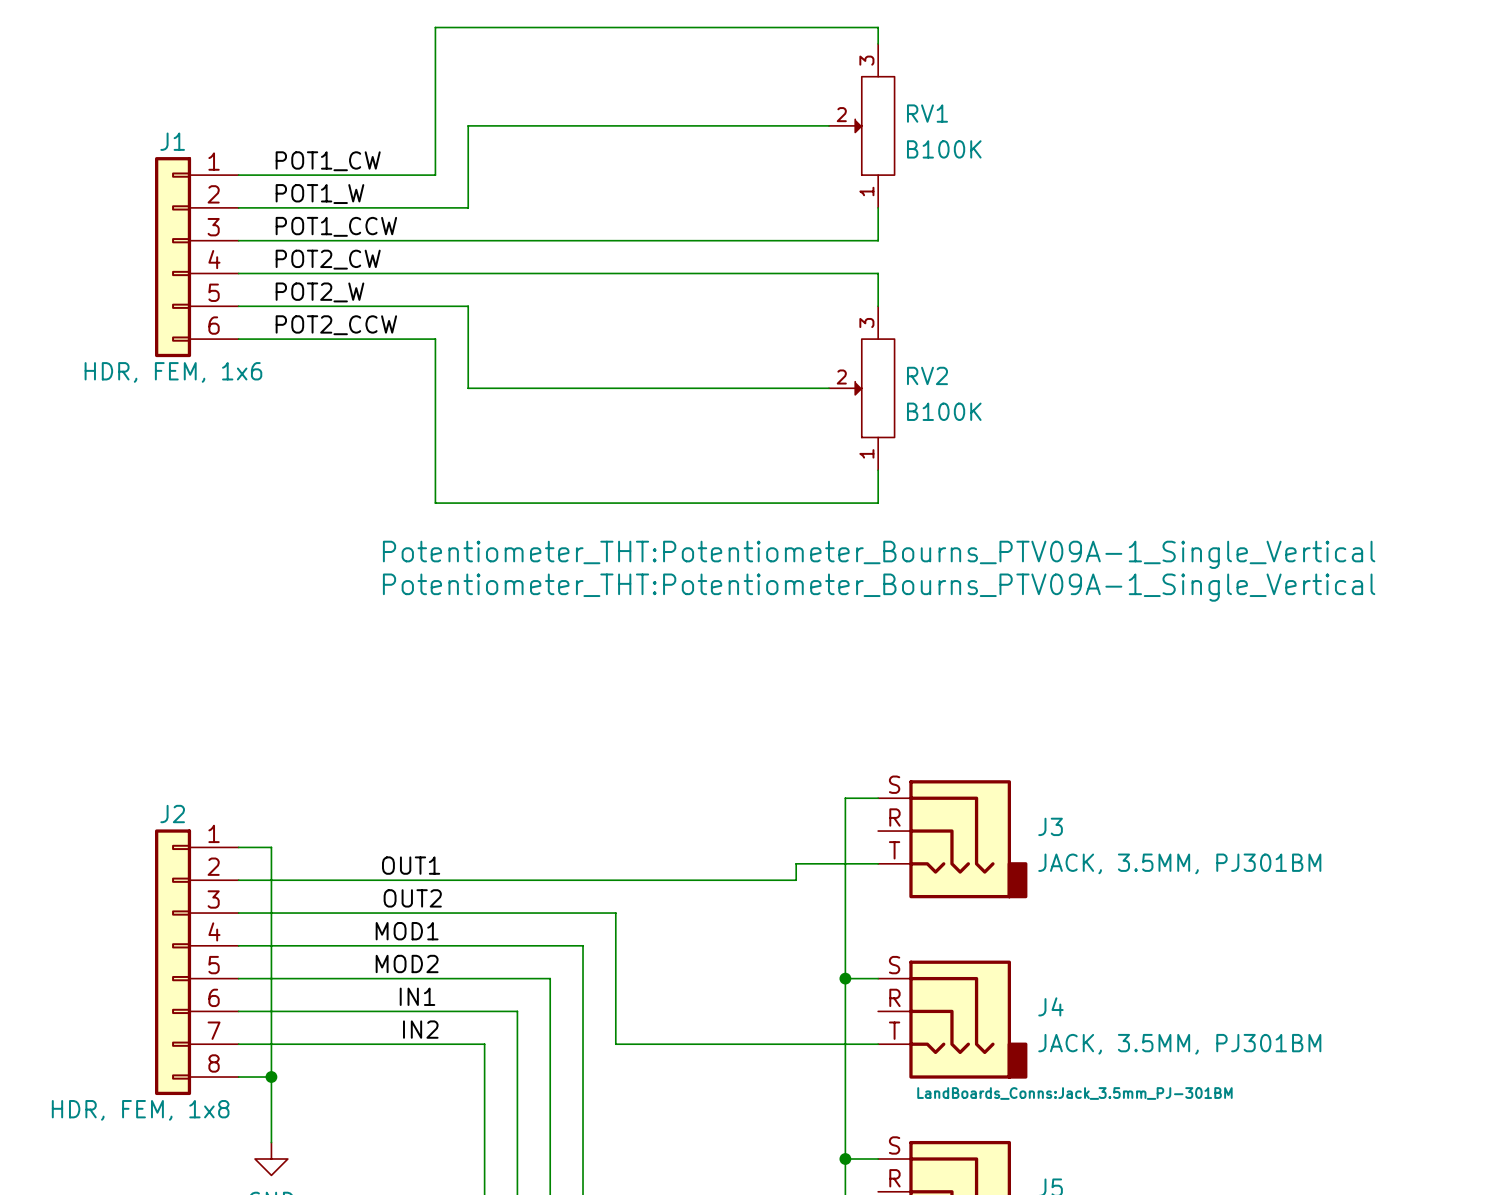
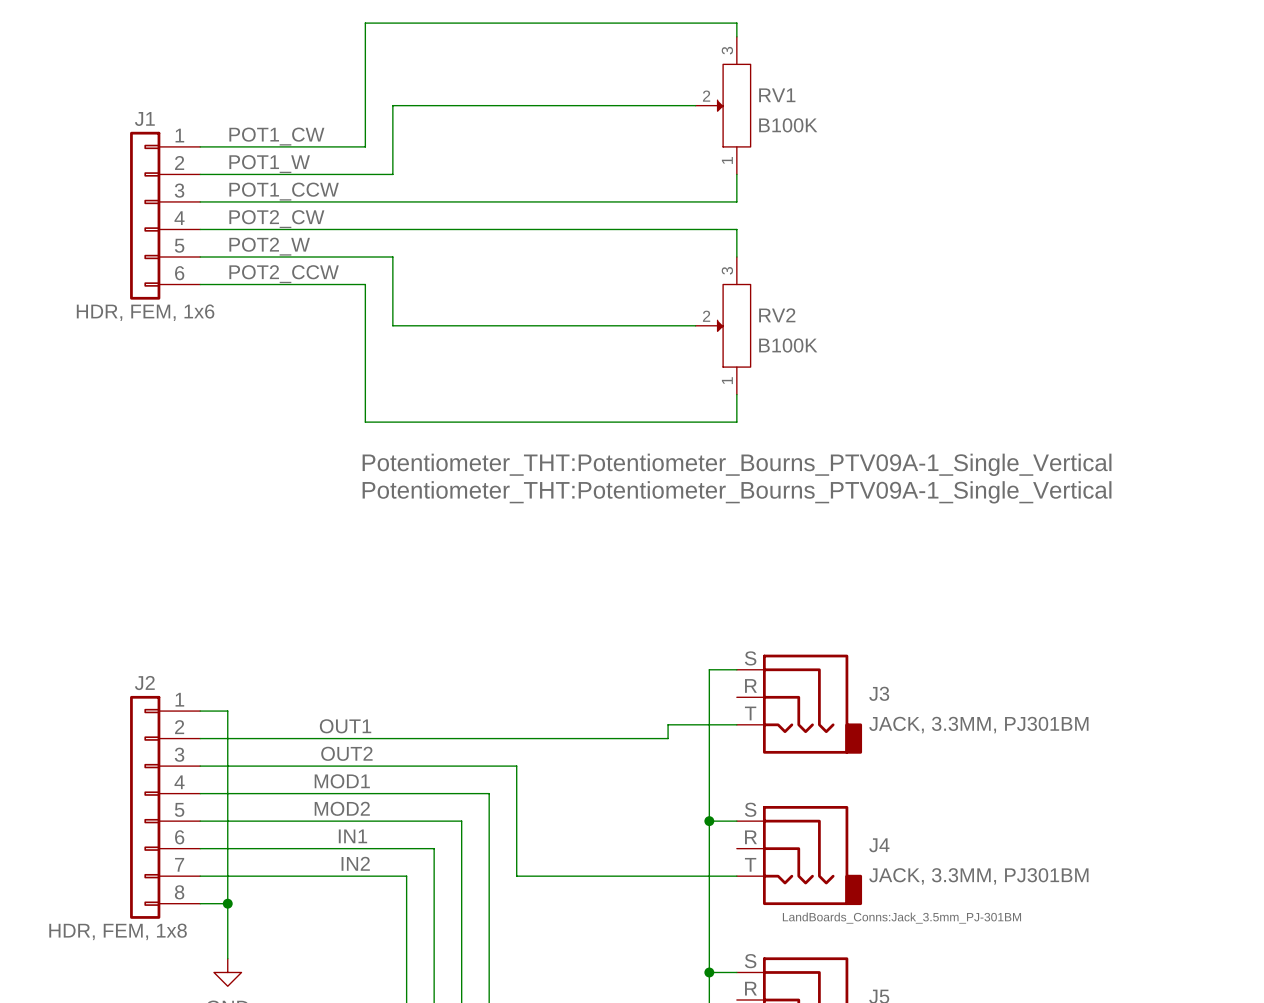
J3 value: JACK, 3.5MM, PJ301BM (1179, 863) -> JACK, 3.3MM, PJ301BM (978, 725)
J4 value: JACK, 3.5MM, PJ301BM (1179, 1044) -> JACK, 3.3MM, PJ301BM (978, 876)

